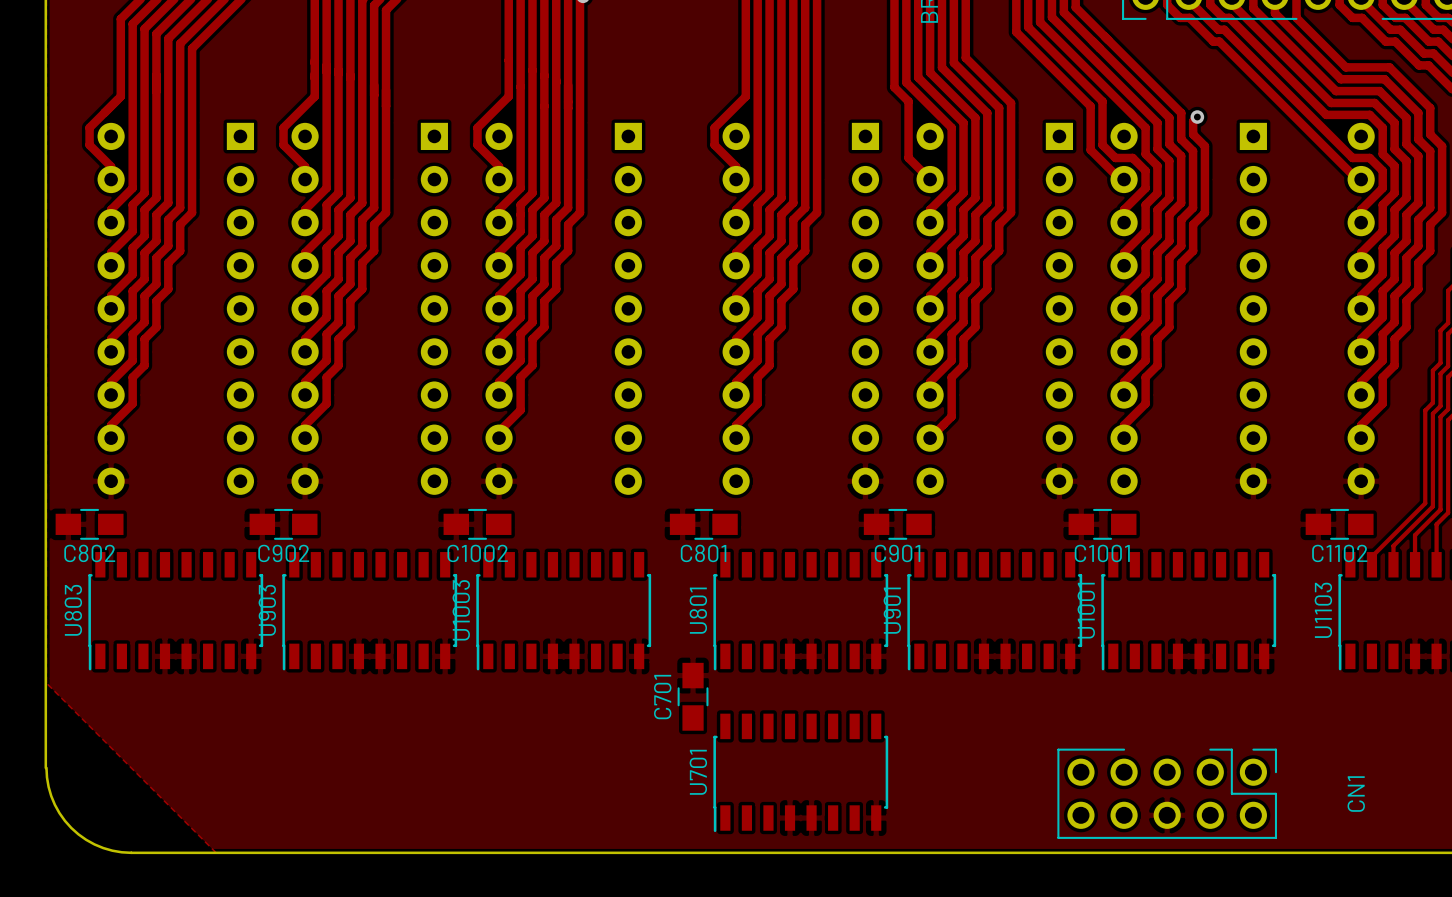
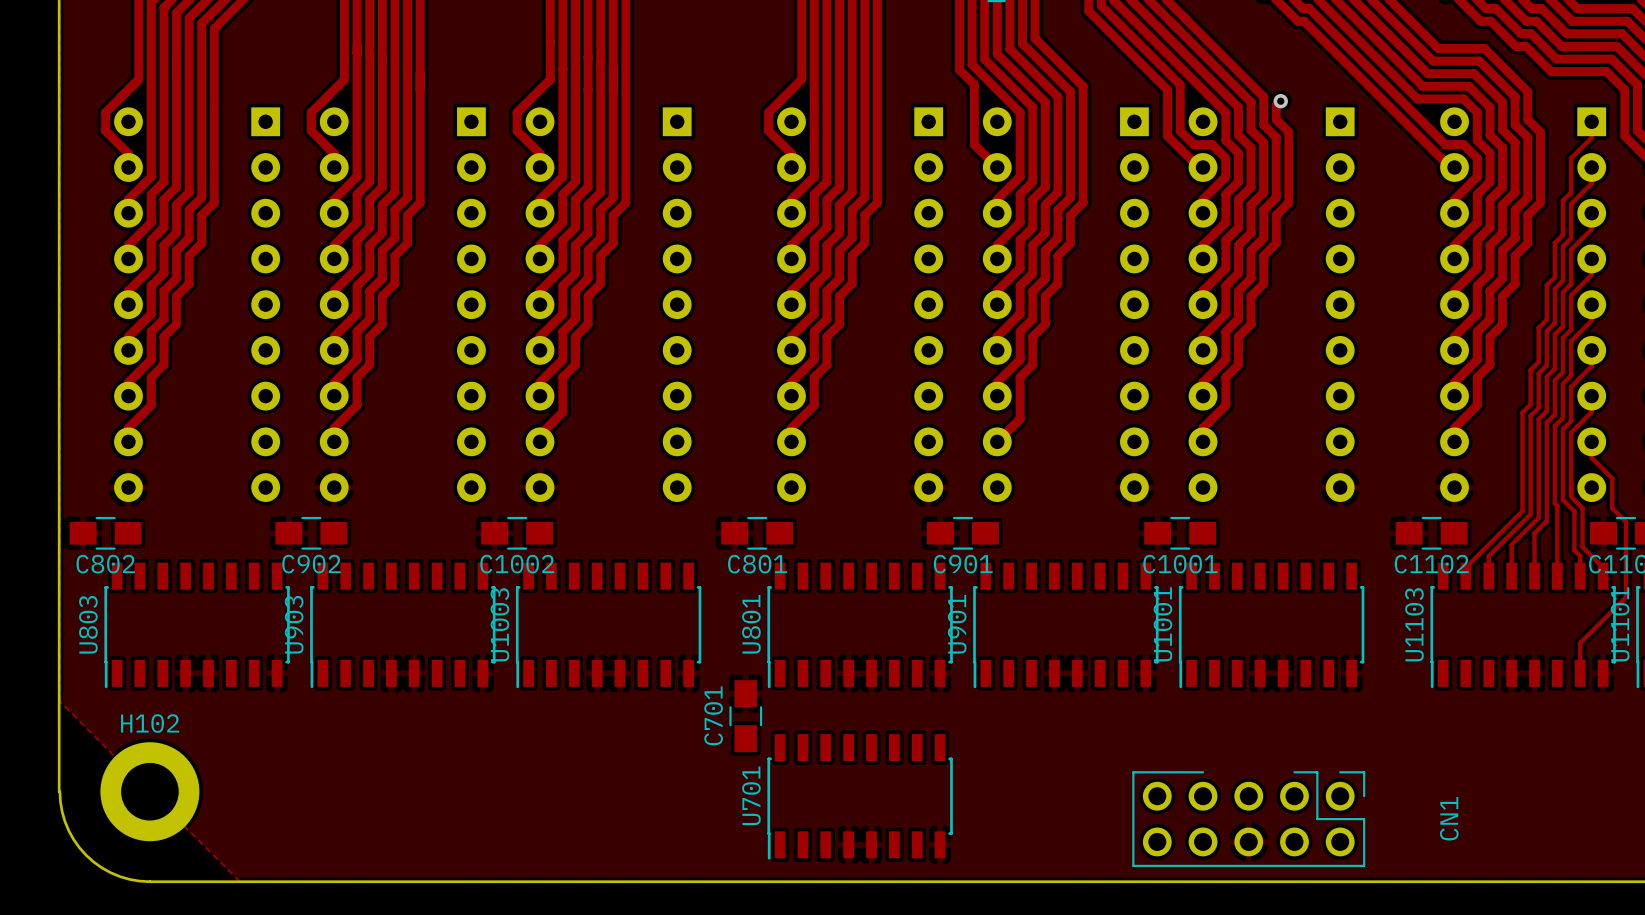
H102: none -> (149, 791)

